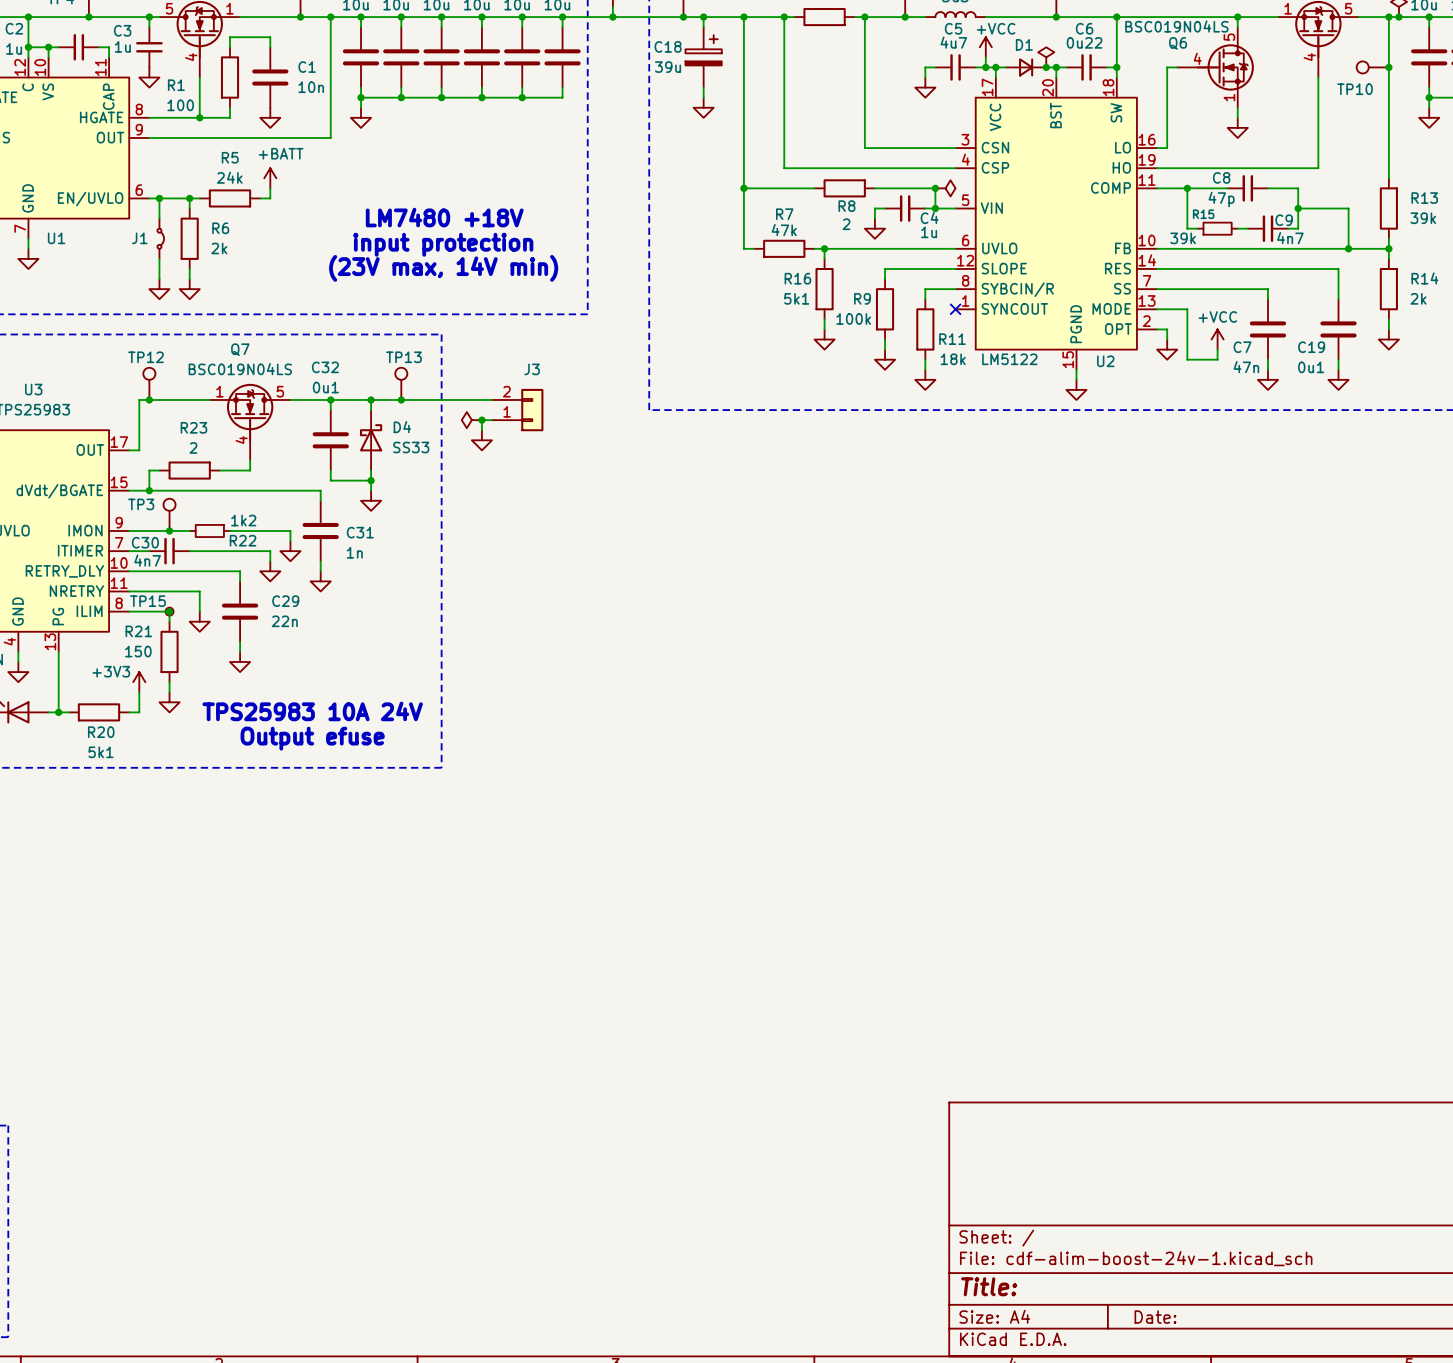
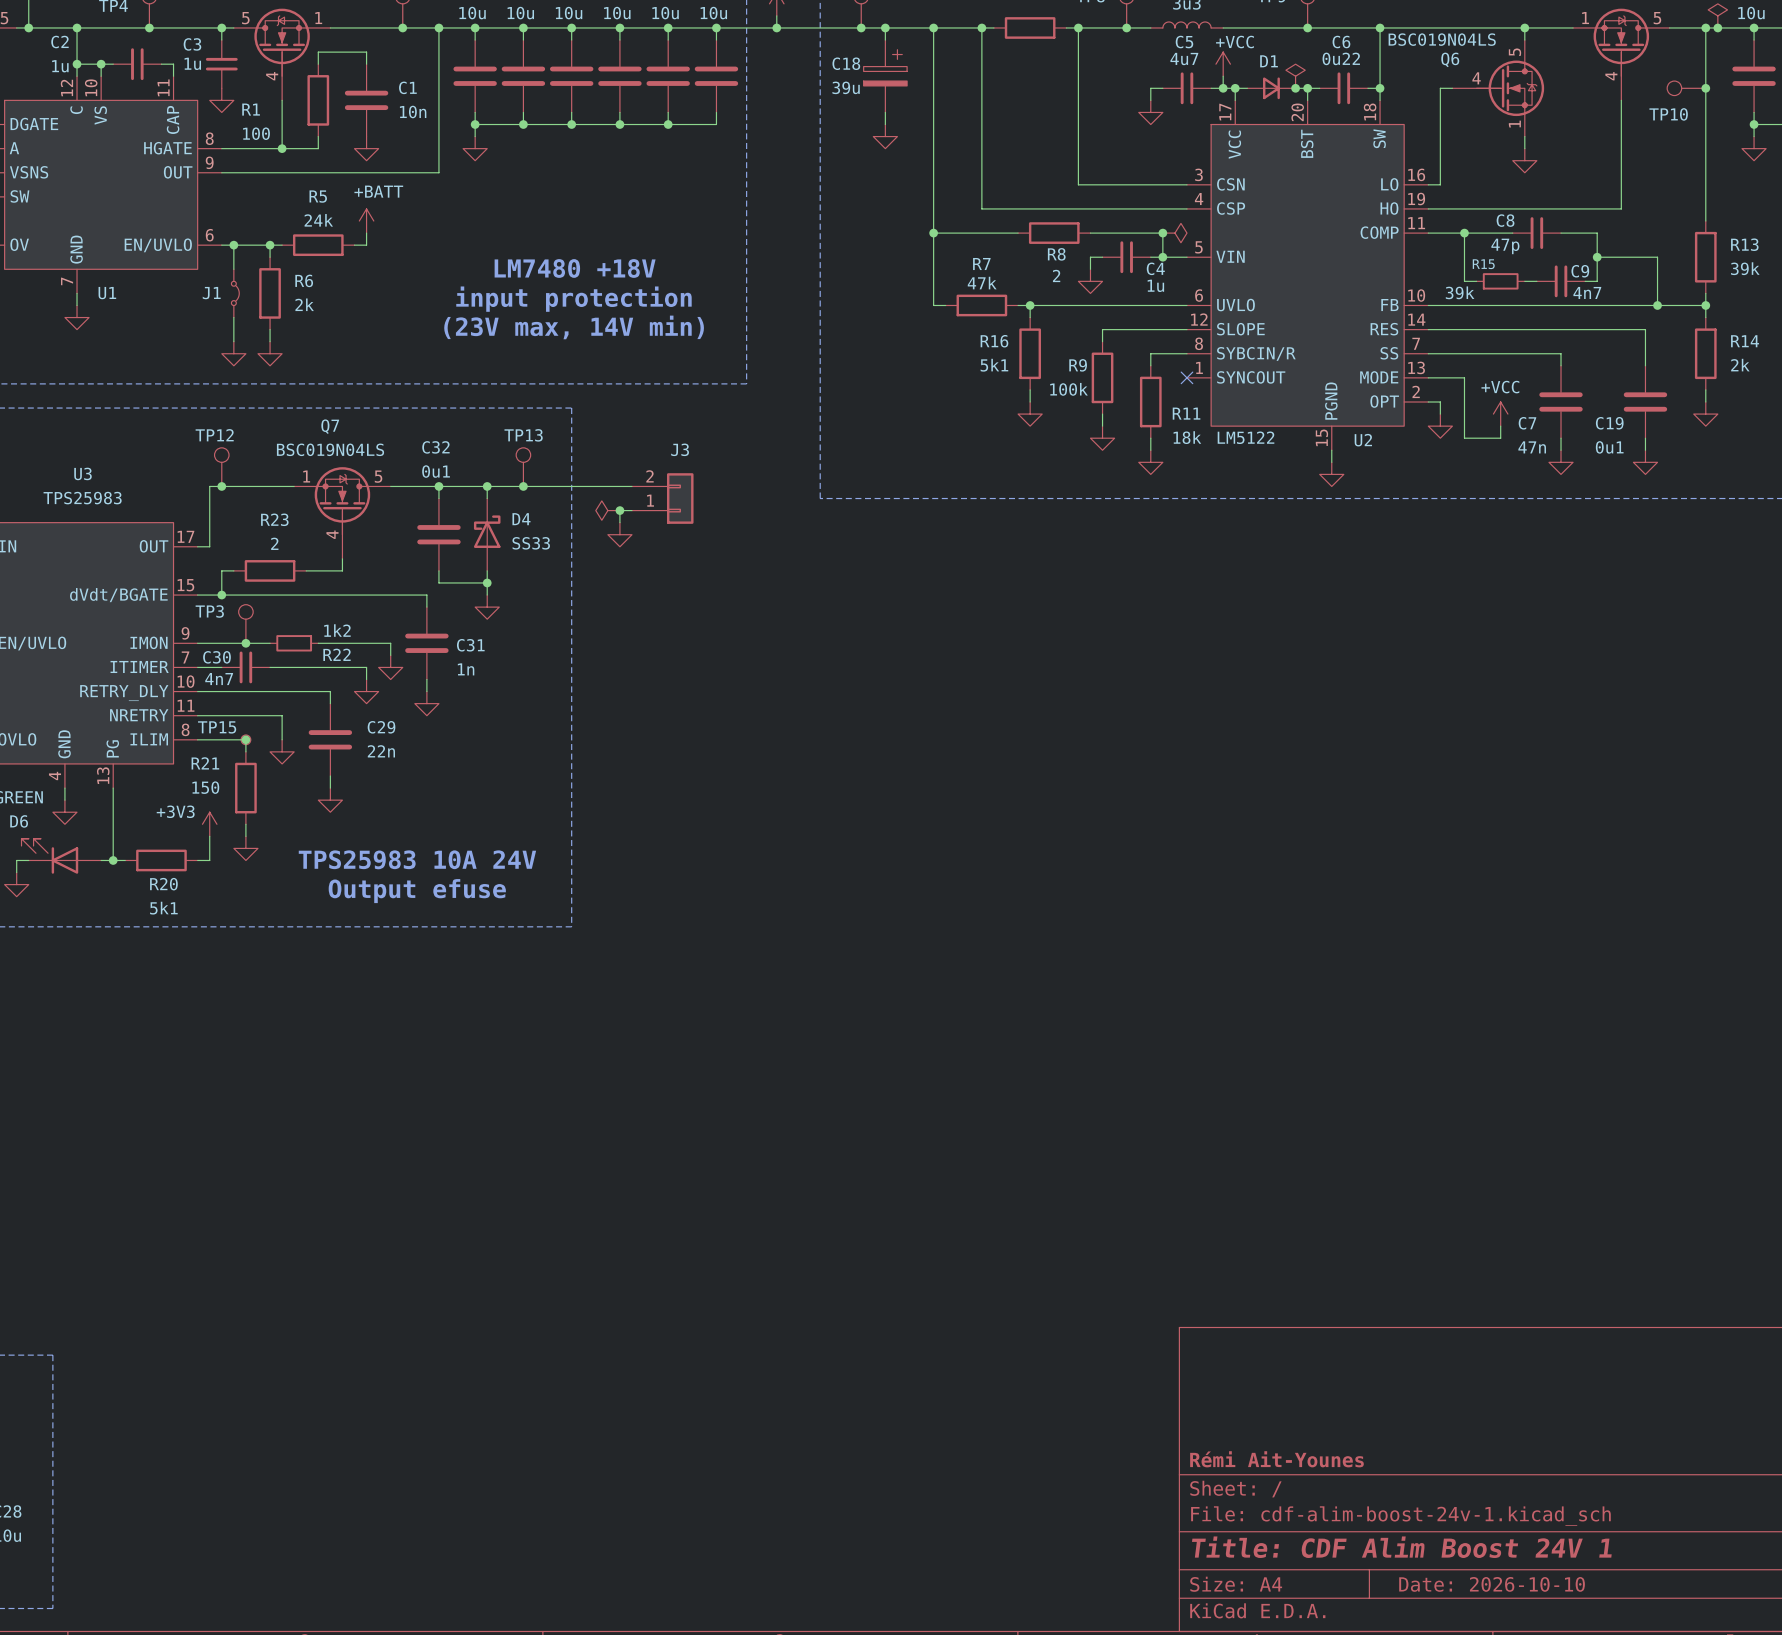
title block: none -> Rémi Ait-Younes (1276, 1459)
title block: Title: (989, 1286) -> Title: CDF Alim Boost 24V 1 (1401, 1547)
title block: Date: (1155, 1317) -> Date: 2026-10-10 (1492, 1584)

